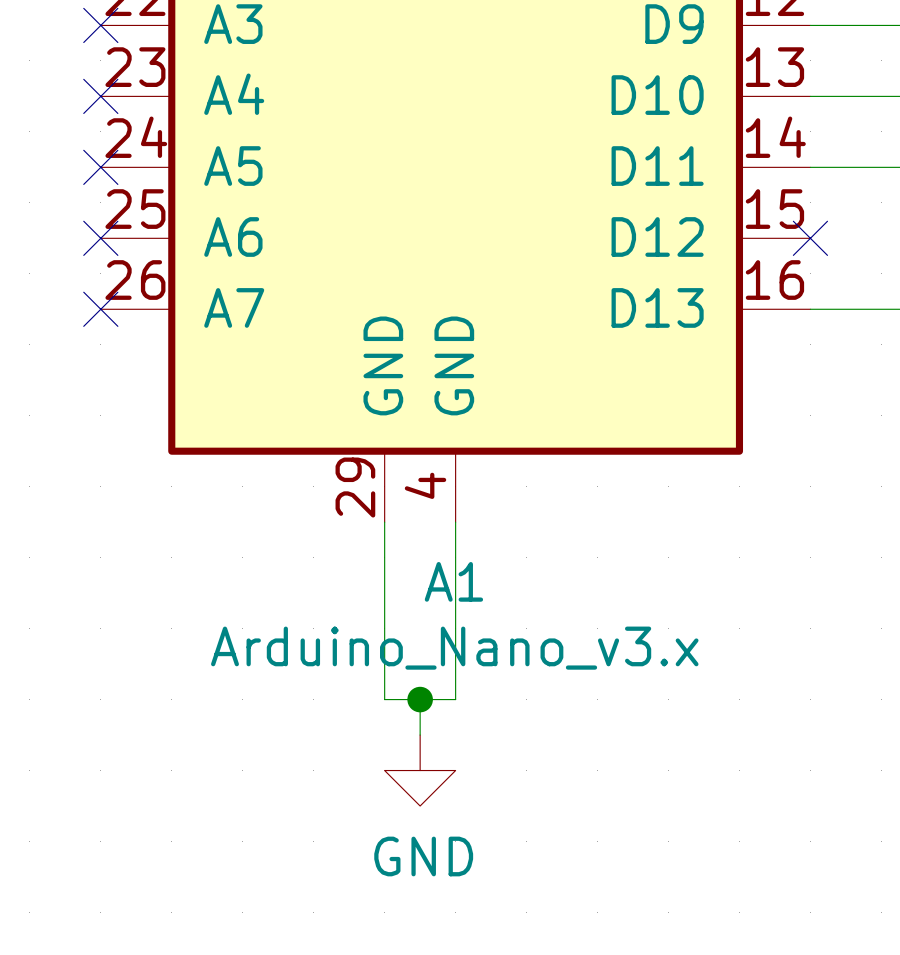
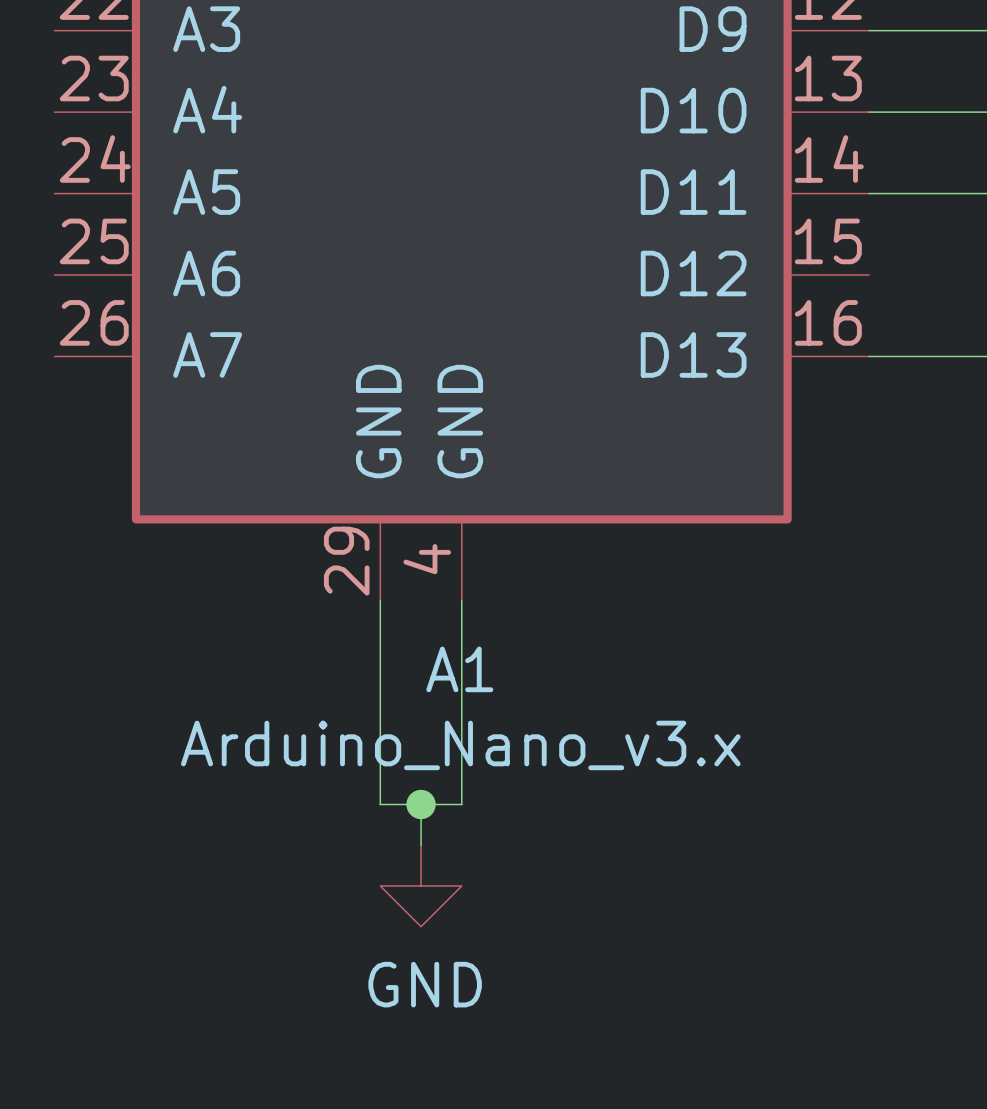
no-connect mark: (100, 25) -> none
no-connect mark: (100, 96) -> none
no-connect mark: (100, 167) -> none
no-connect mark: (100, 238) -> none
no-connect mark: (810, 238) -> none
no-connect mark: (100, 309) -> none

